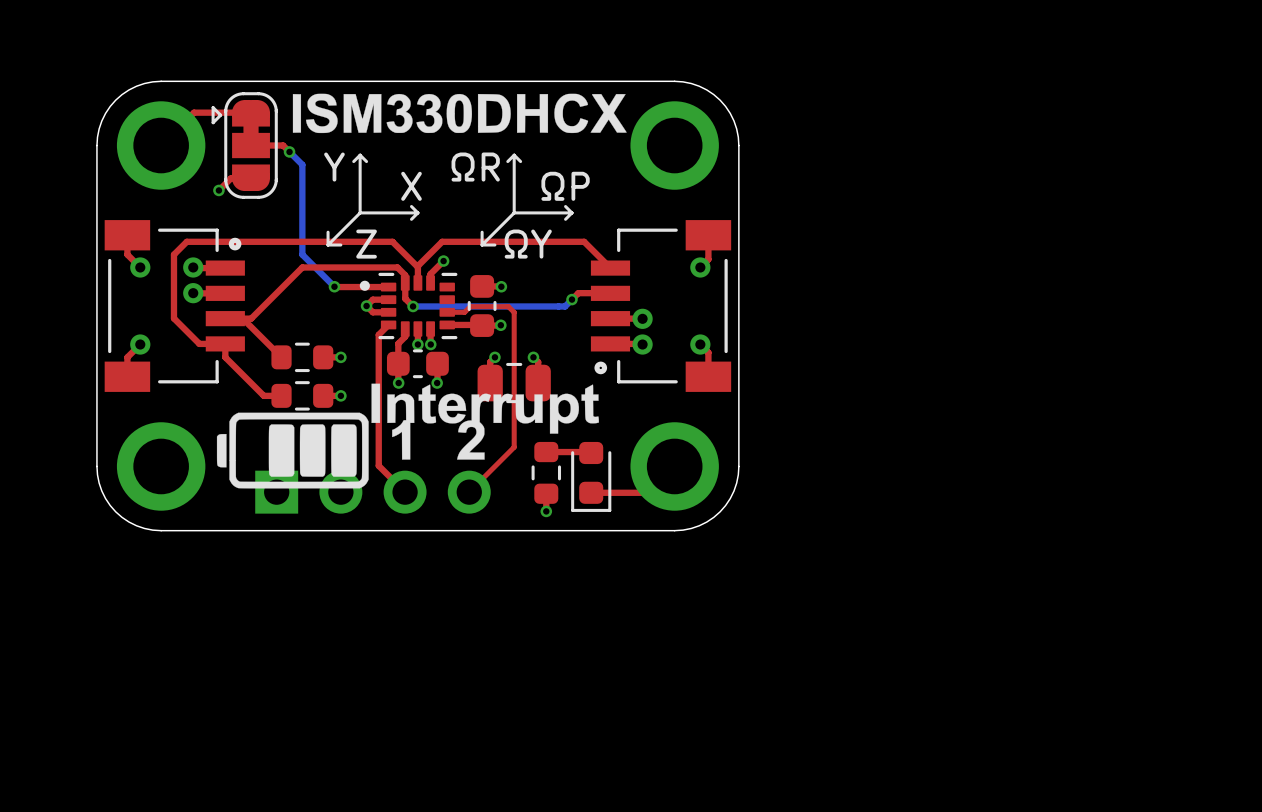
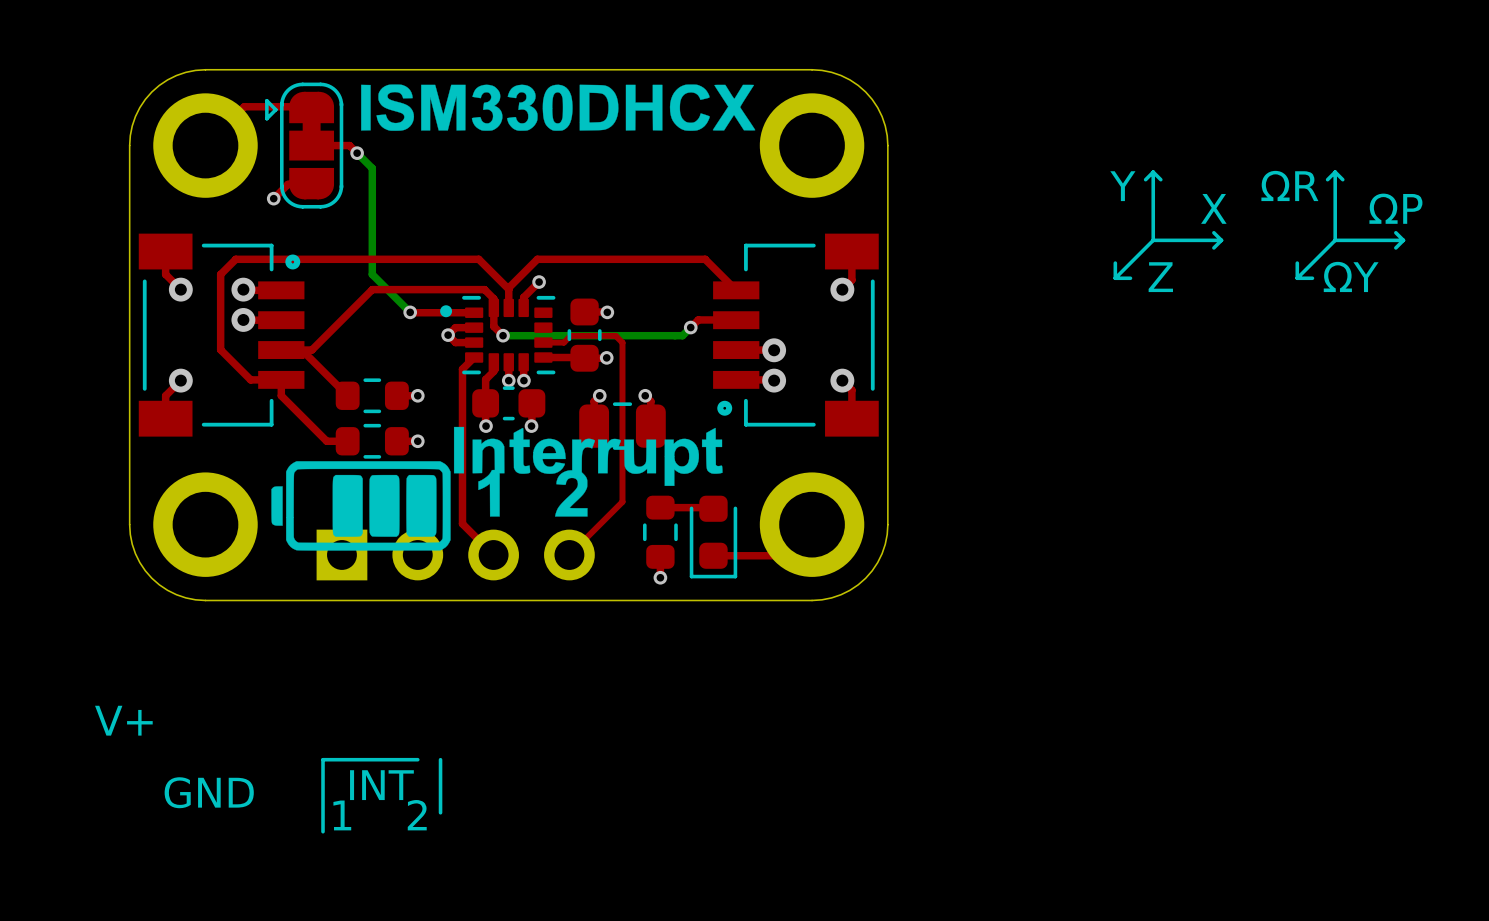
drawing position: (372, 200) -> (1168, 225)
drawing position: (527, 200) -> (1350, 225)
text: none -> V+ (123, 720)
line: none -> (417, 759) (323, 759) (323, 831)
line: none -> (440, 759) (440, 812)
text: none -> INT (381, 785)
text: none -> GND (209, 792)
text: none -> 1 (342, 815)
text: none -> 2 (417, 815)

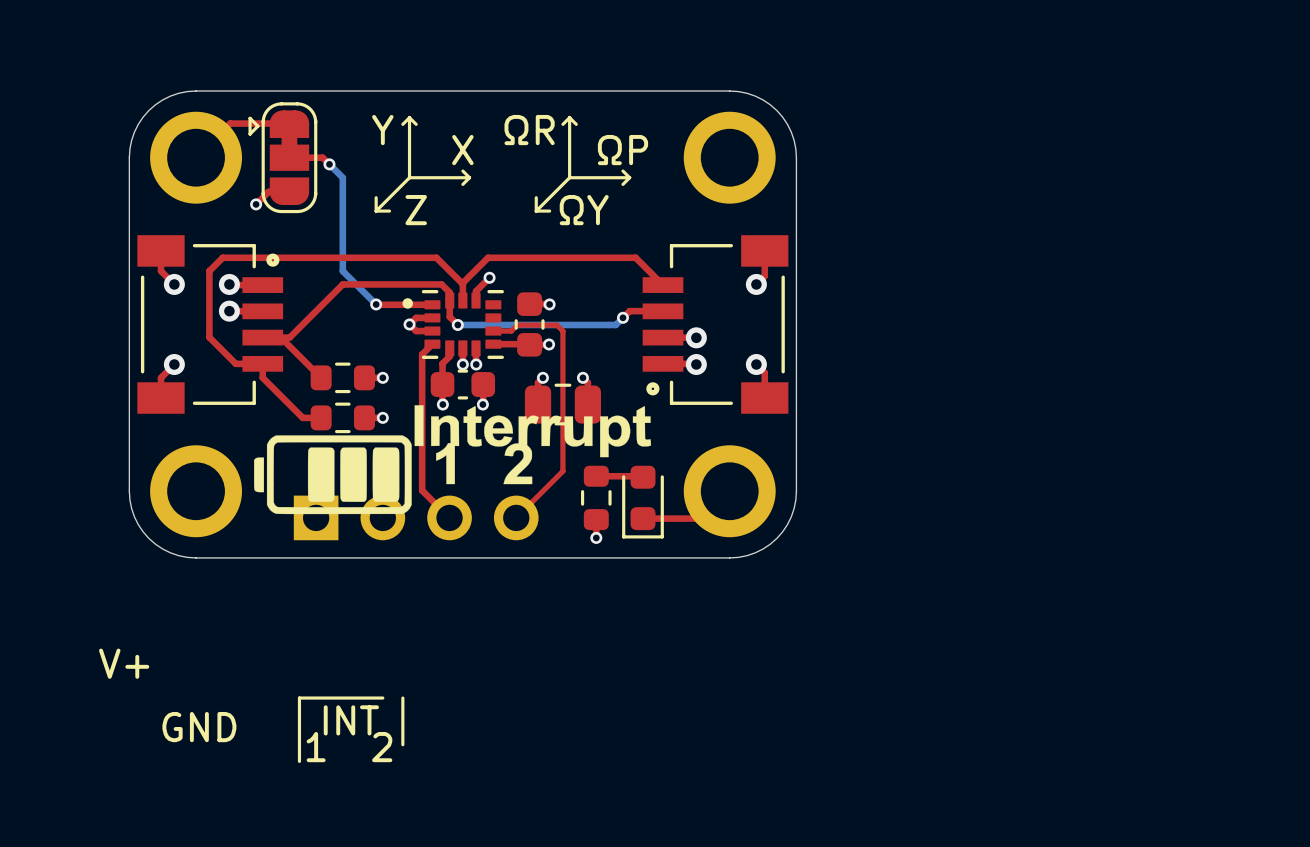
drawing: [361, 84, 756, 131] -> none
drawing position: (1168, 225) -> (422, 164)
drawing position: (1350, 225) -> (582, 164)

